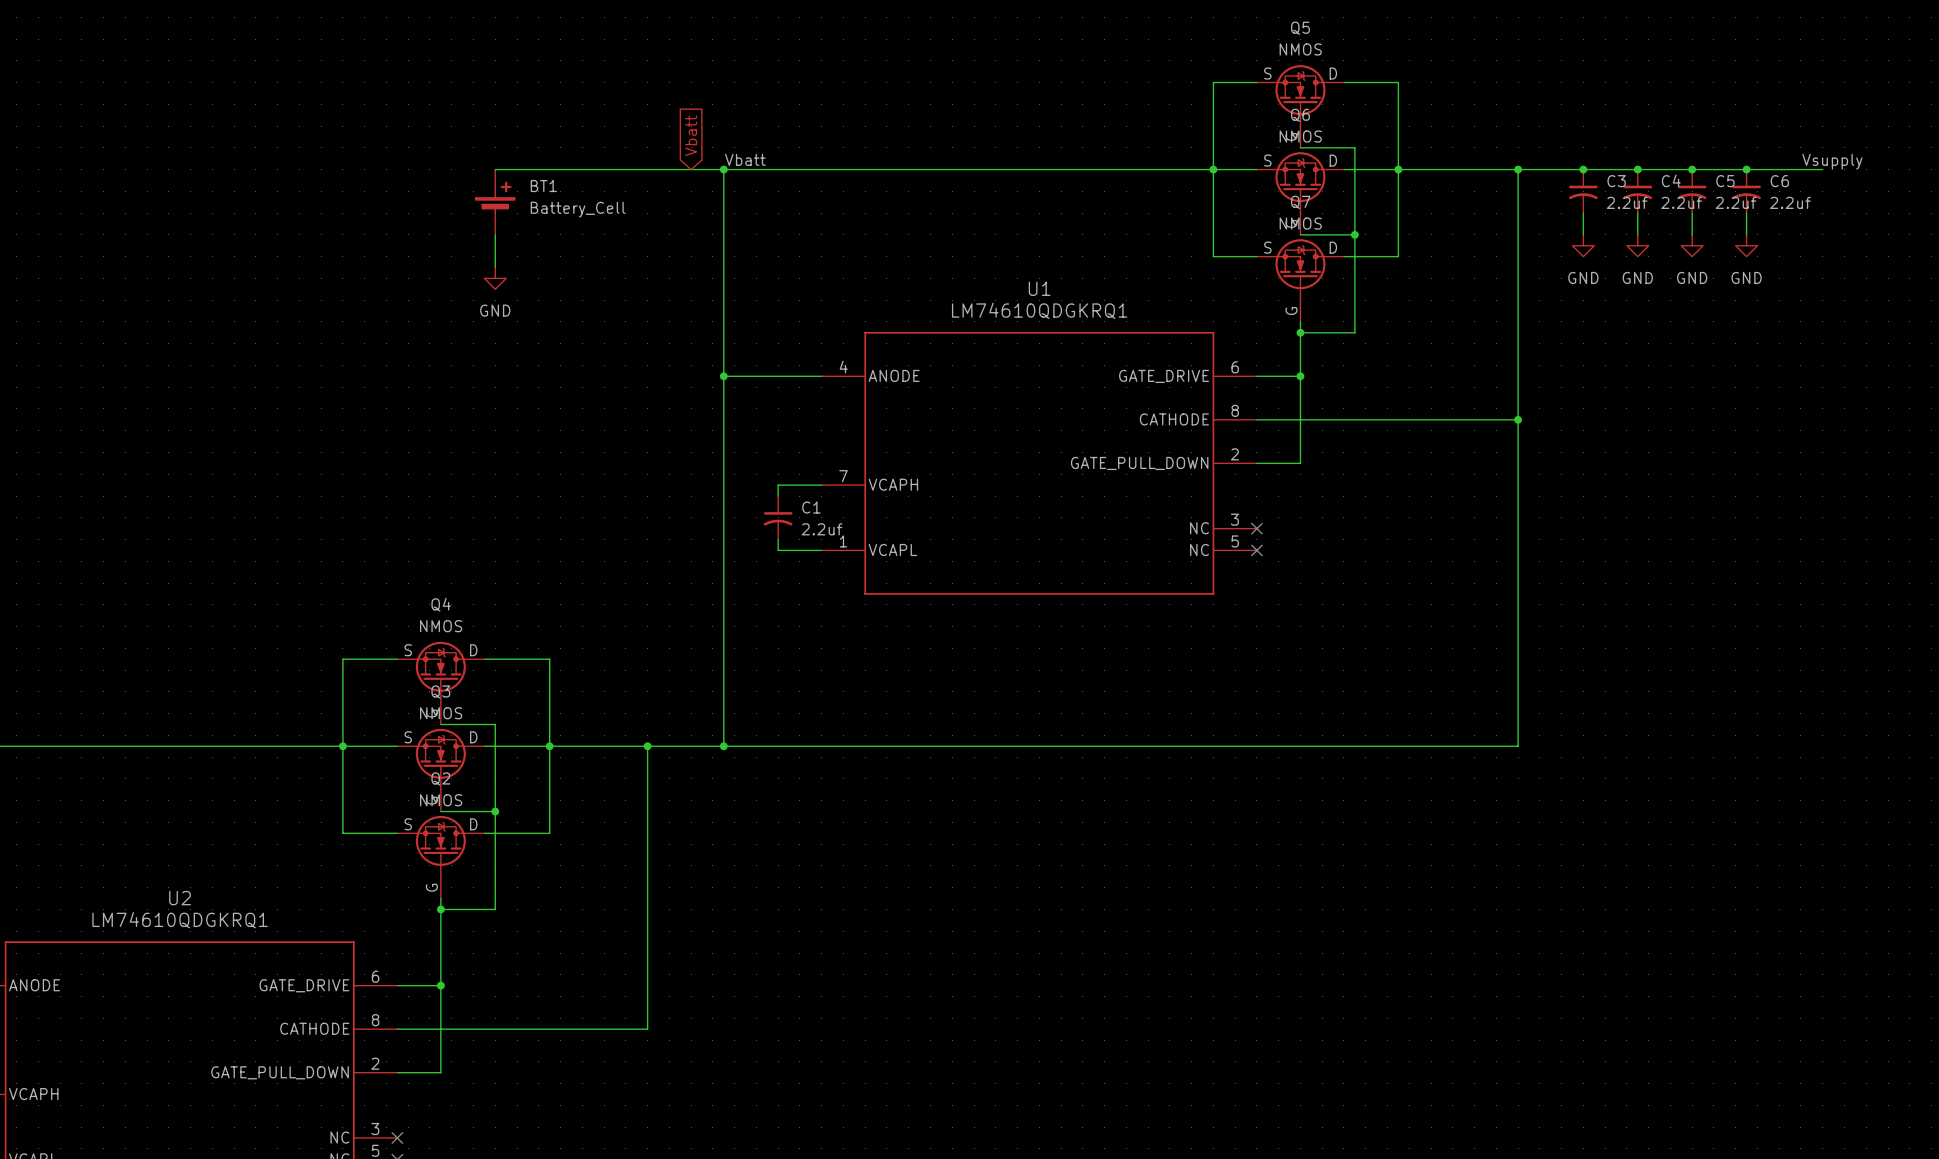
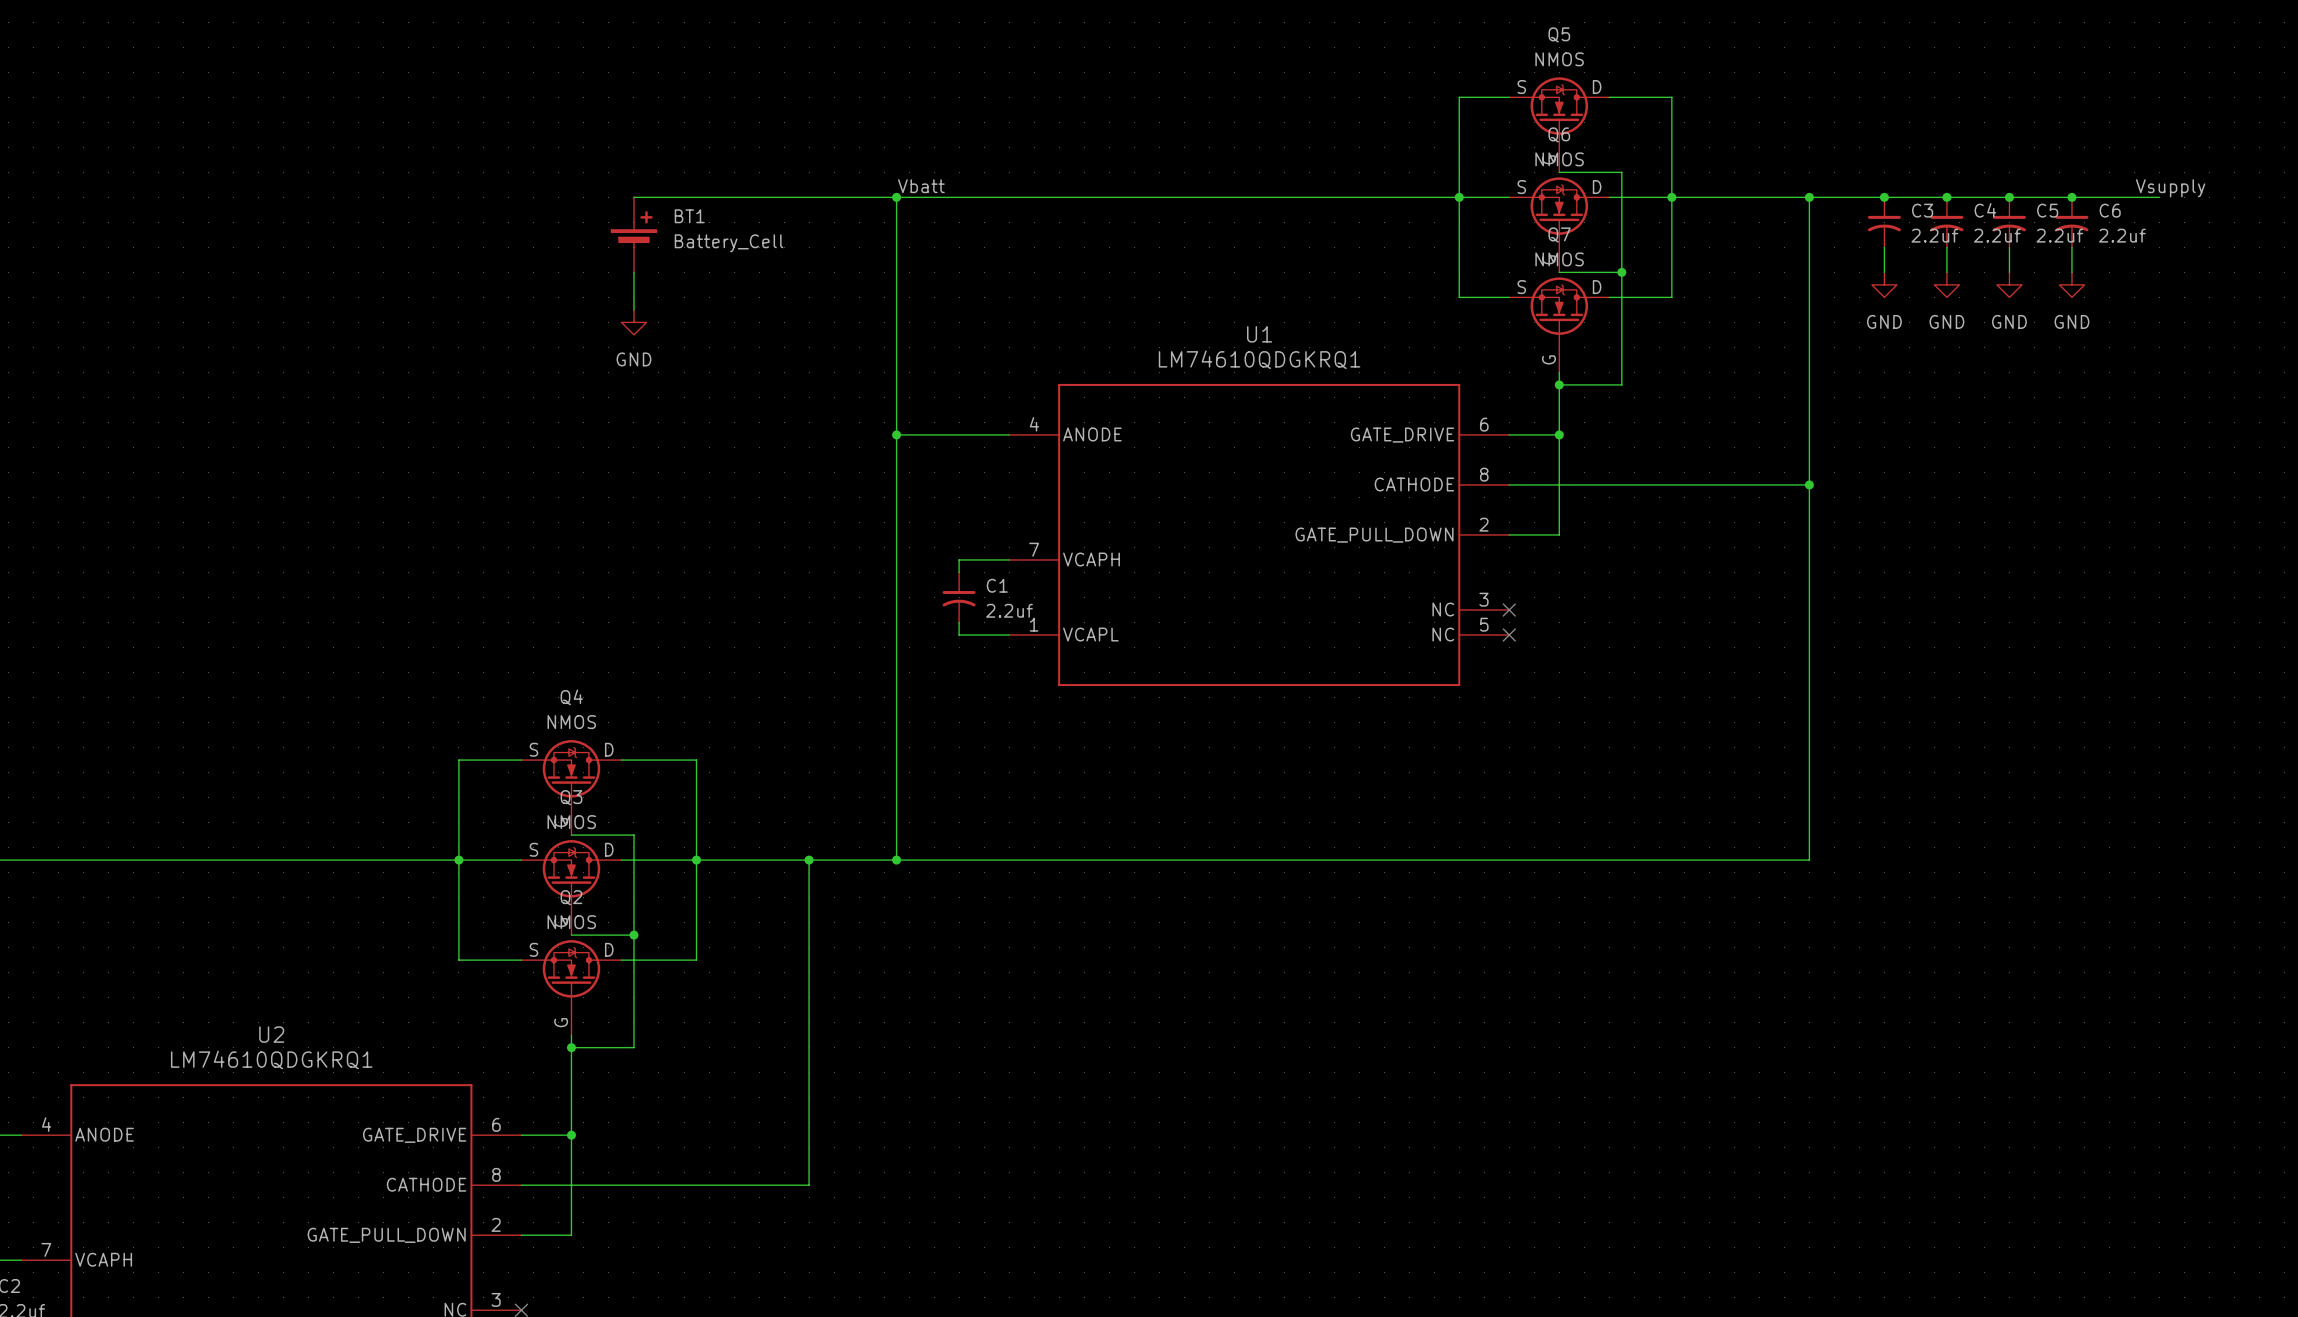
global label: Vbatt (691, 135) -> none

